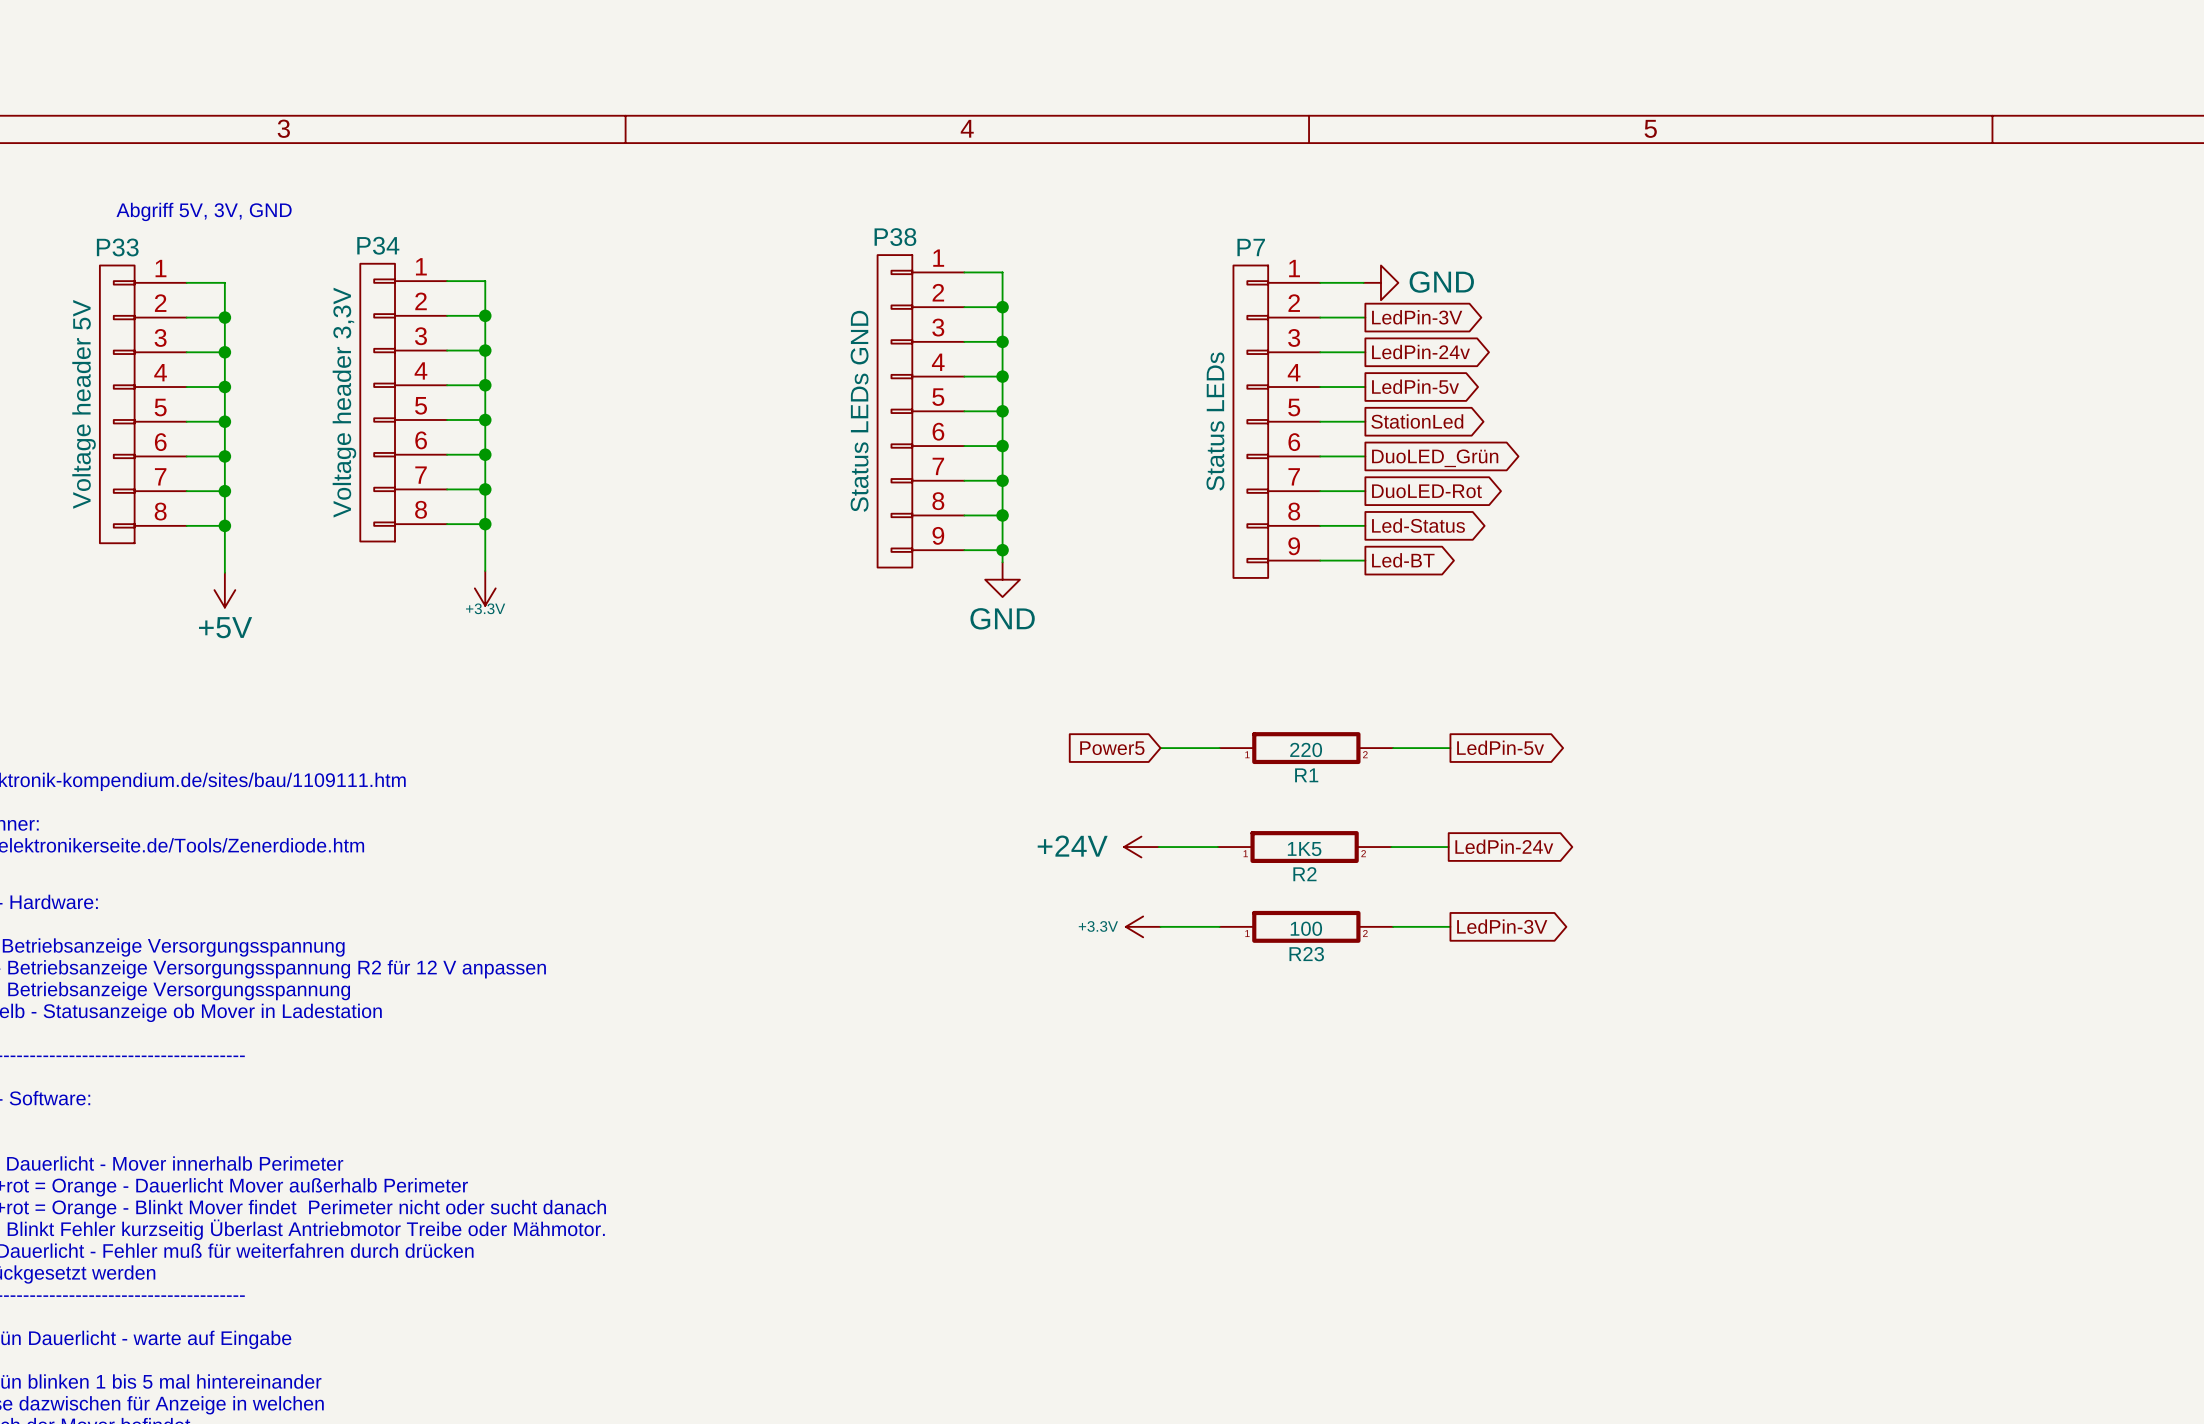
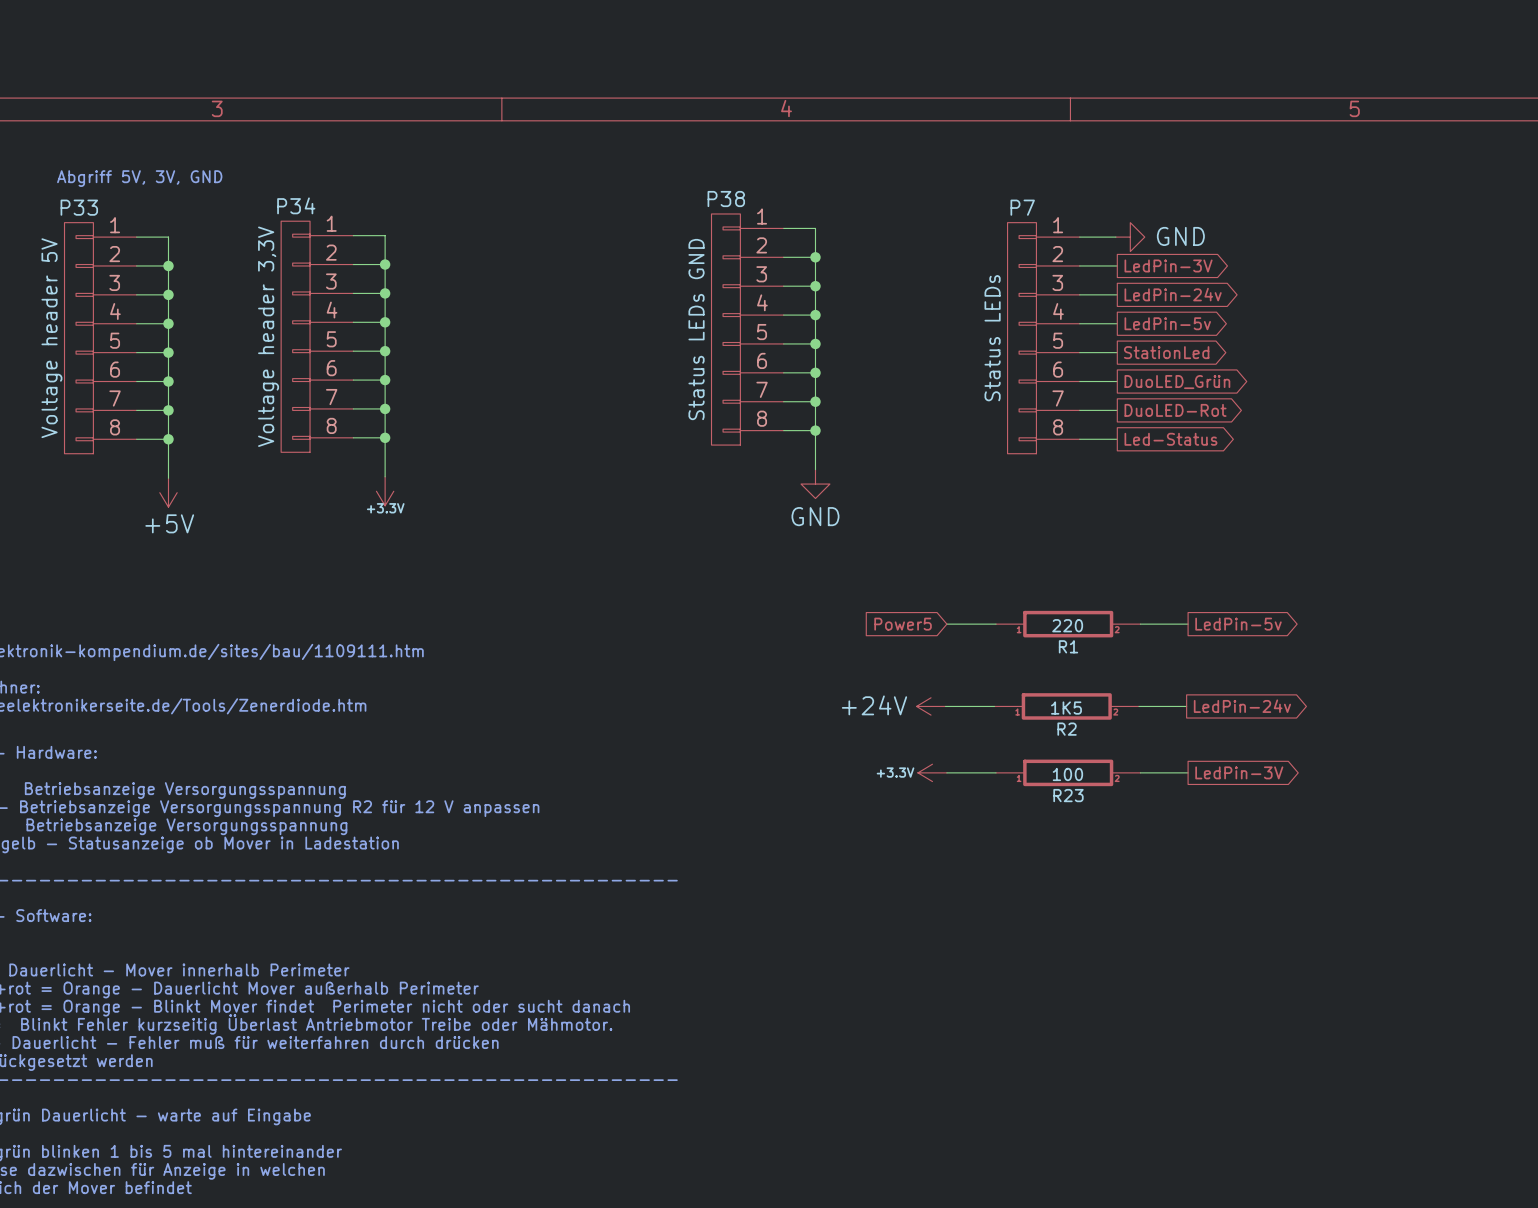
P38 symbol: [877, 255, 965, 568] -> [711, 213, 784, 446]
P7 symbol: [1233, 265, 1321, 578] -> [1007, 222, 1080, 454]
wire: (964, 550) (1002, 550) -> none
junction: (1002, 550) -> none
wire: (1320, 560) (1365, 560) -> none
global label: Led-BT (1403, 560) -> none

